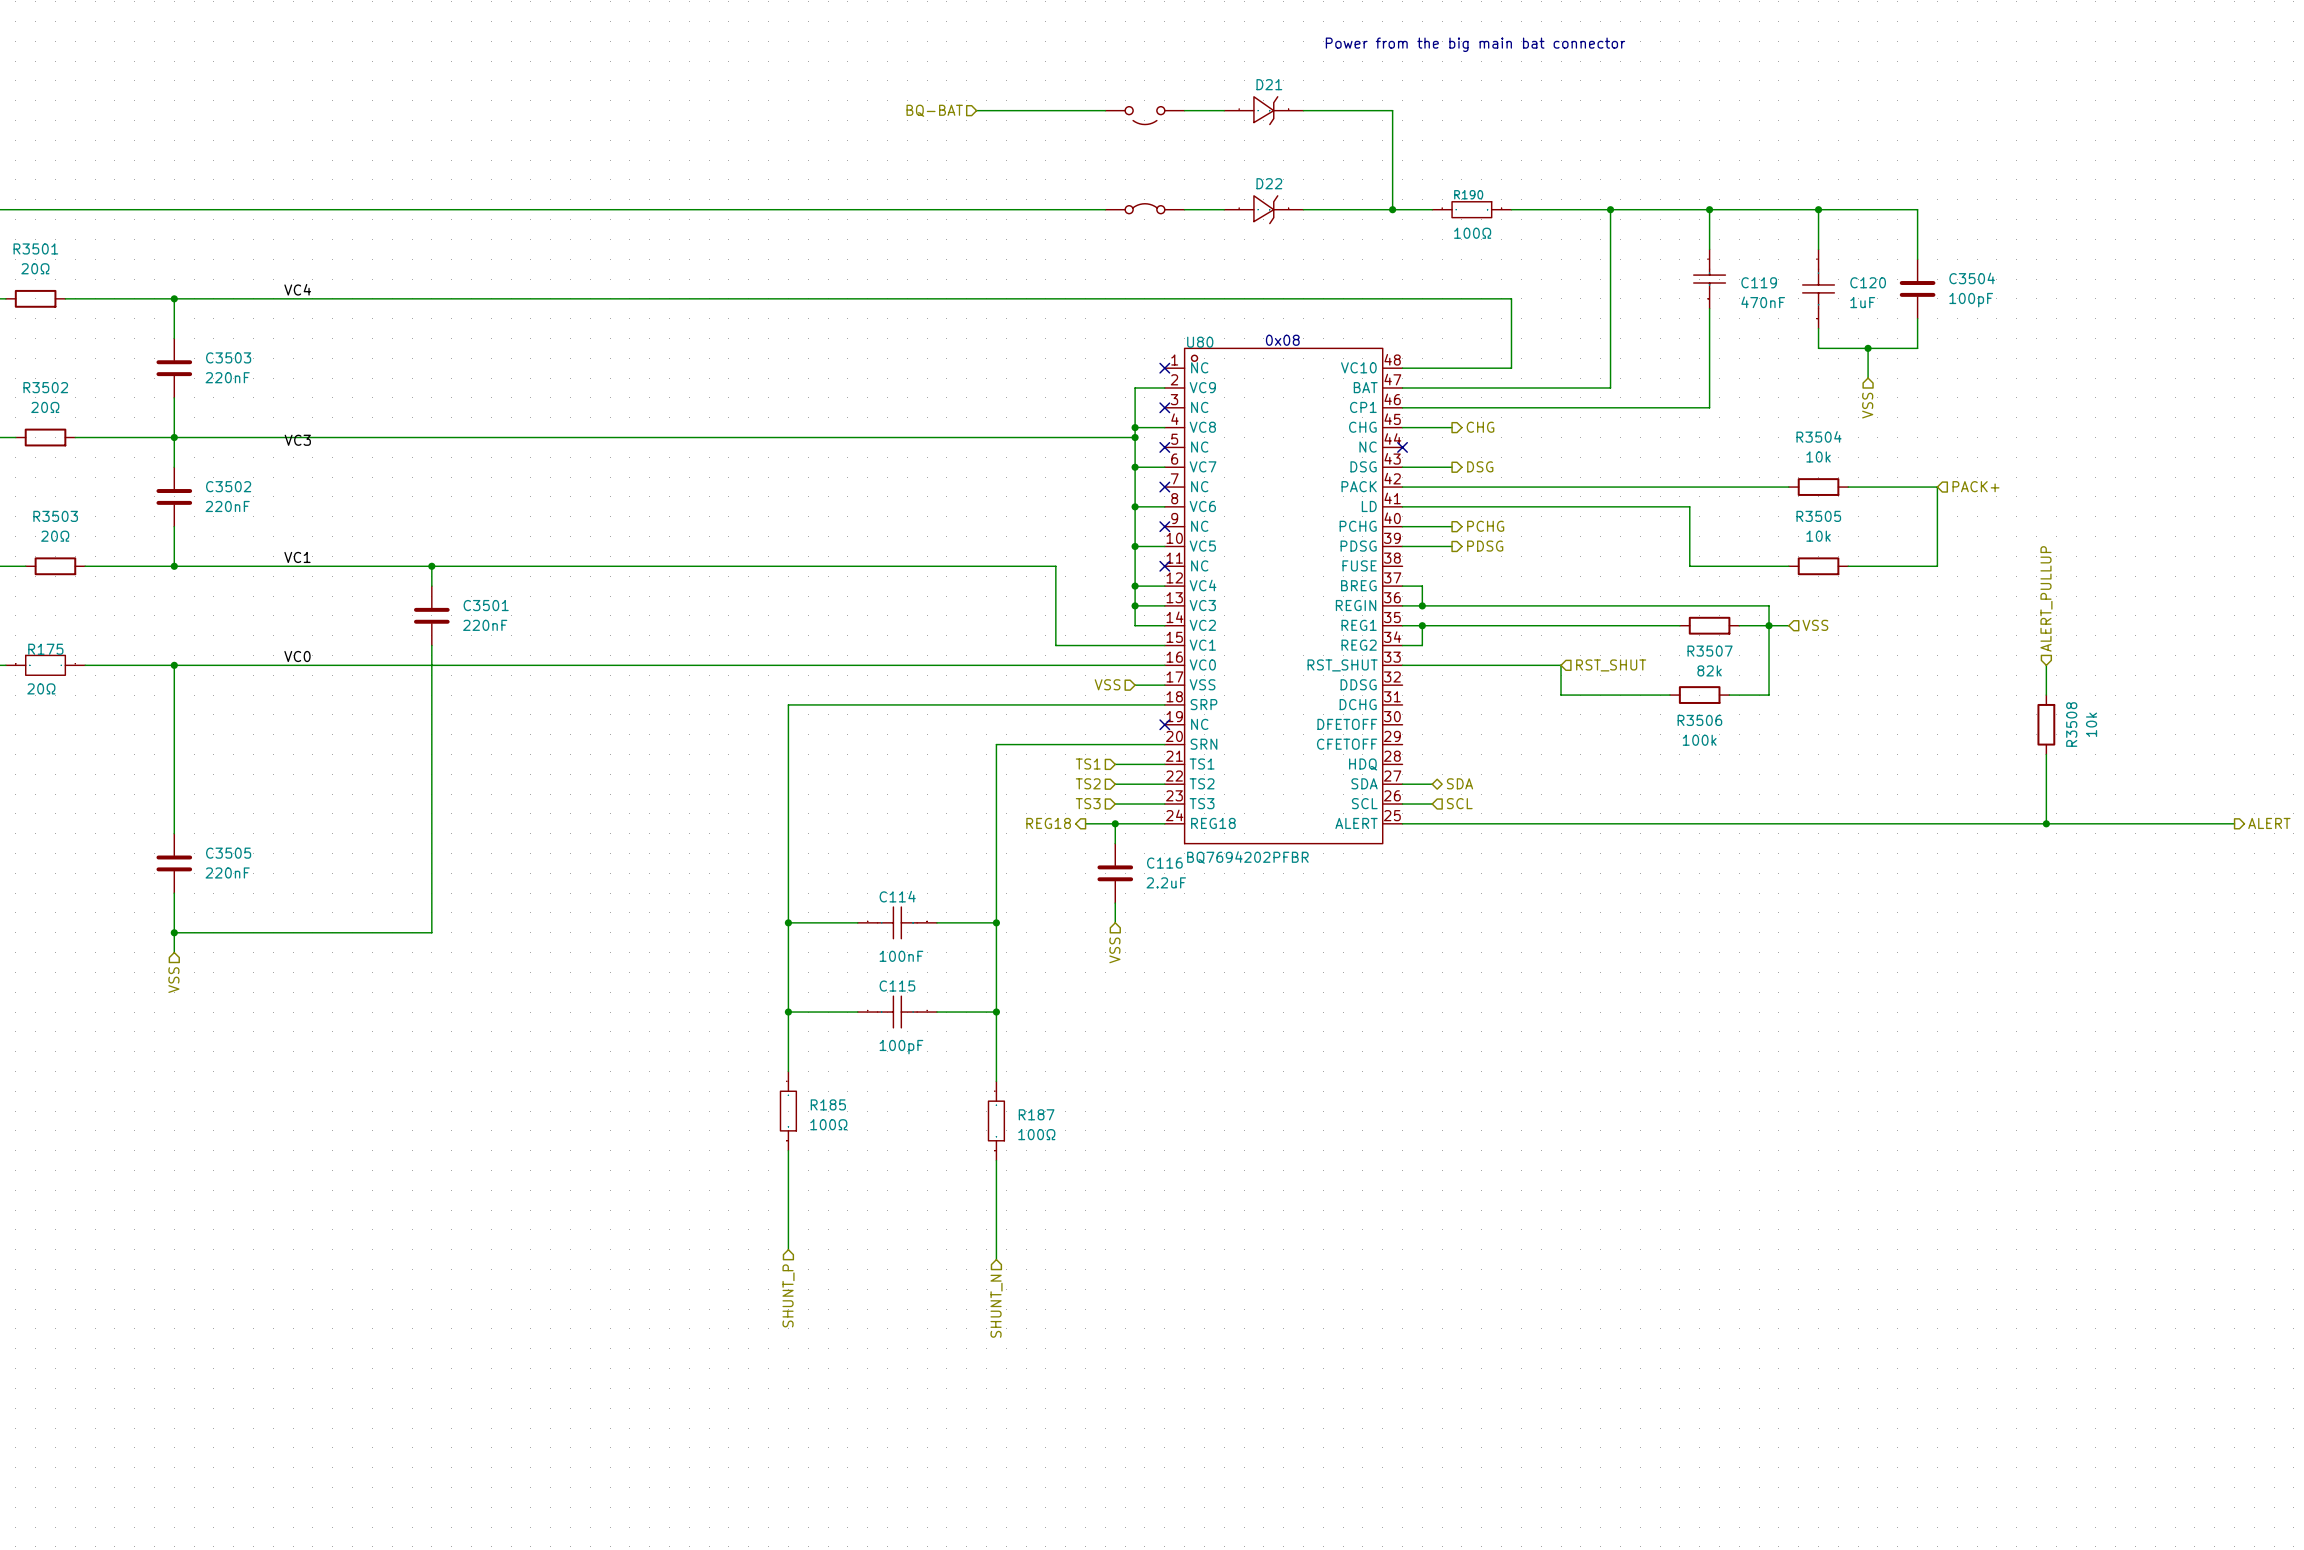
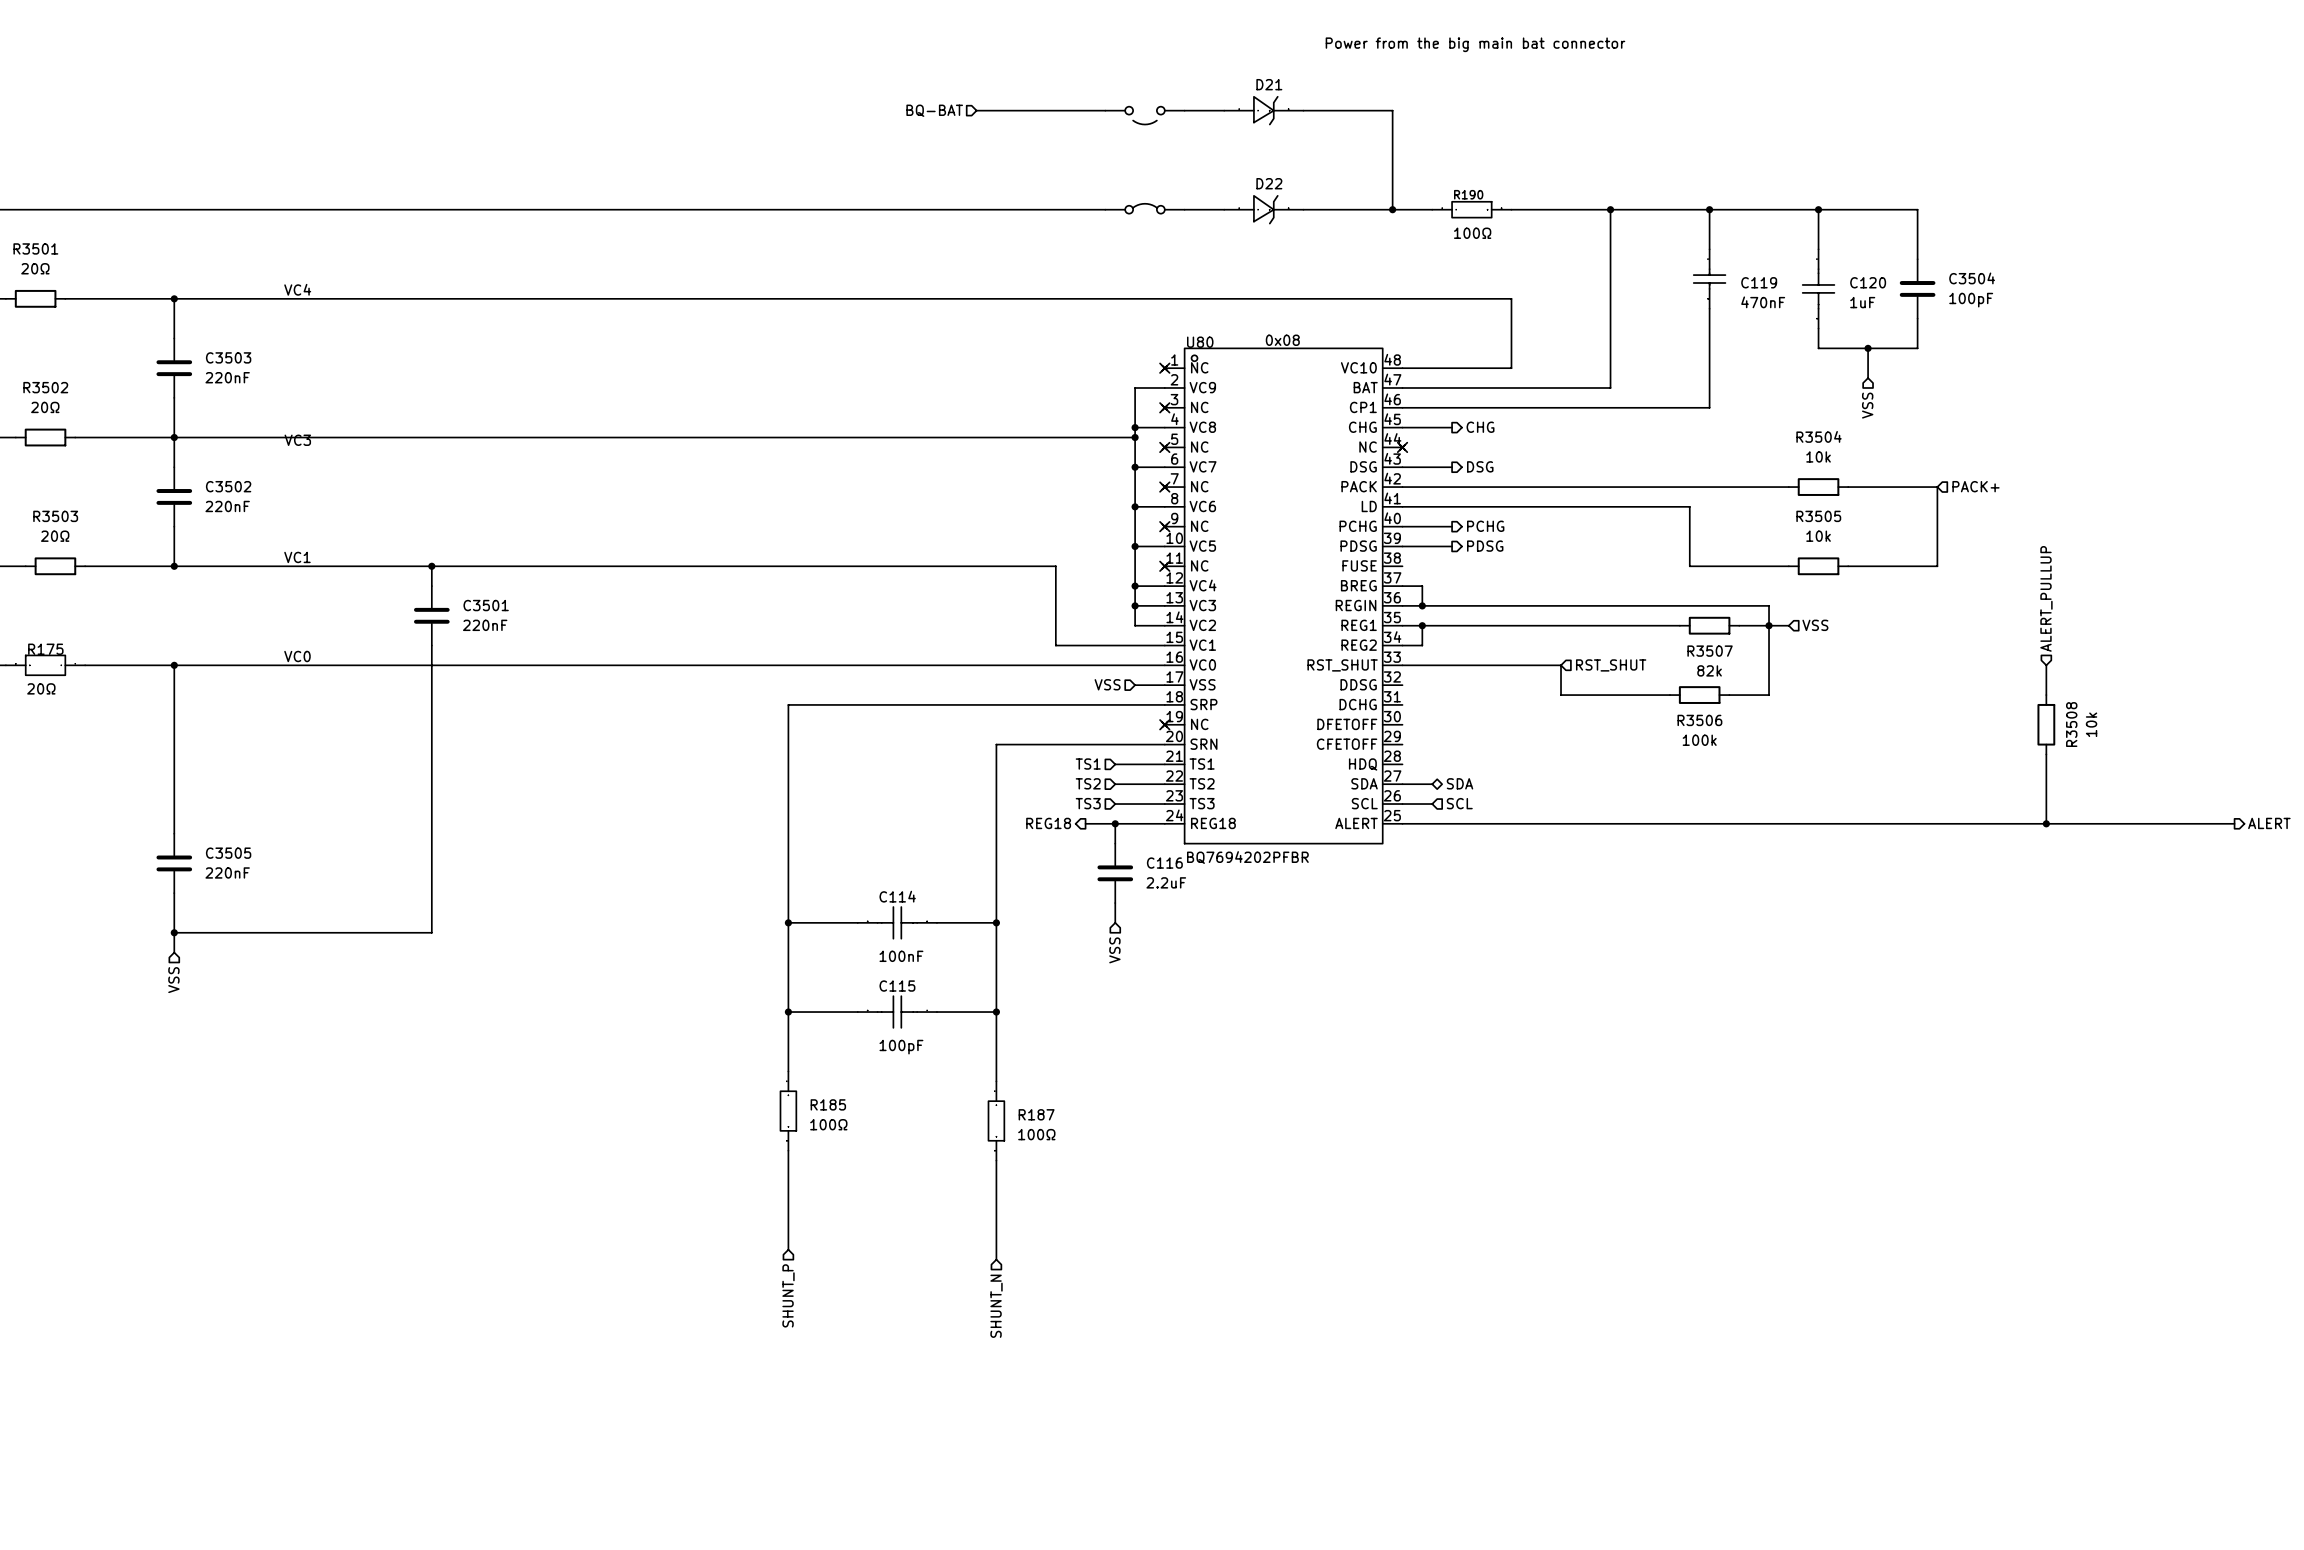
U80 symbol: [1164, 348, 1403, 844] -> [1162, 348, 1405, 844]

